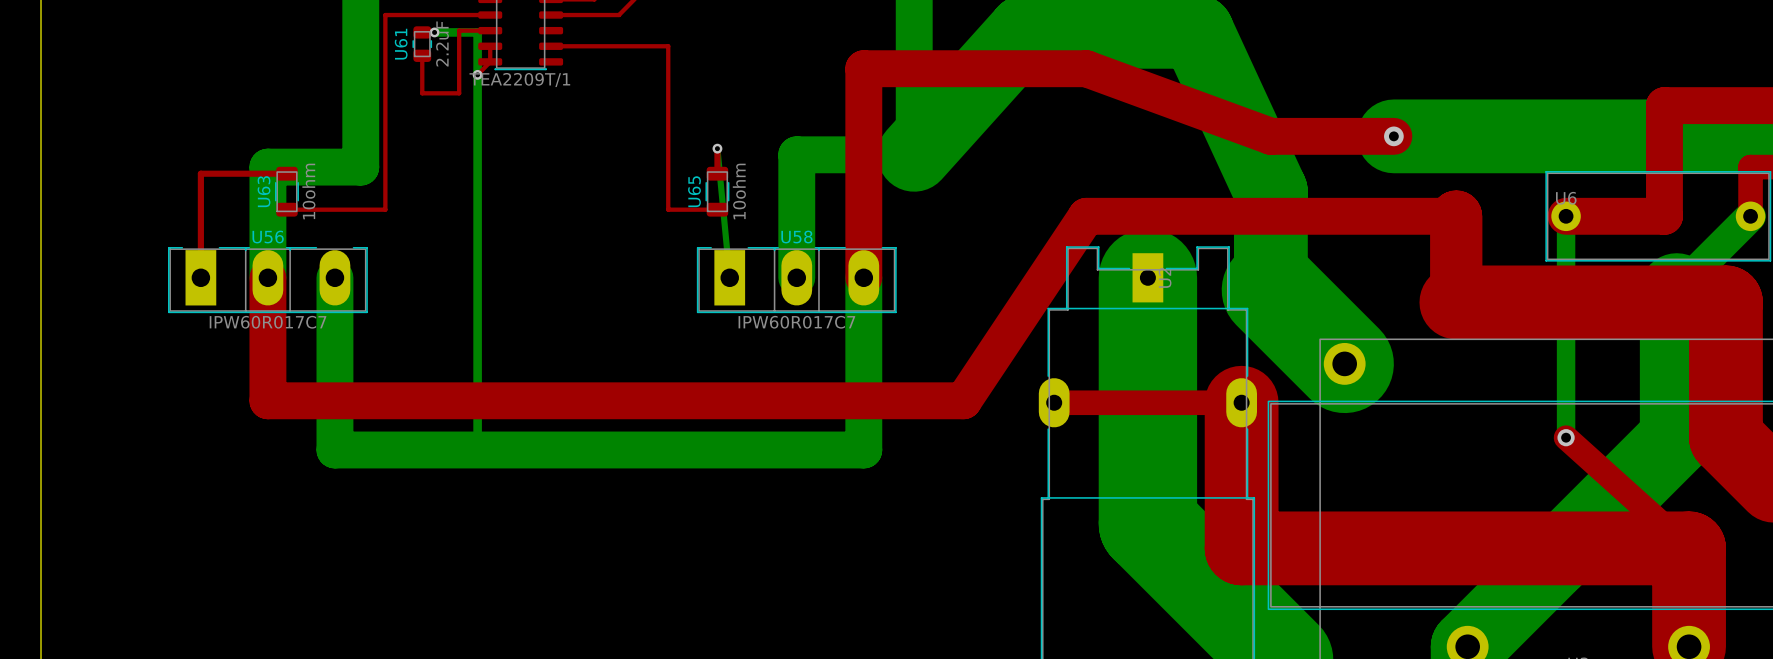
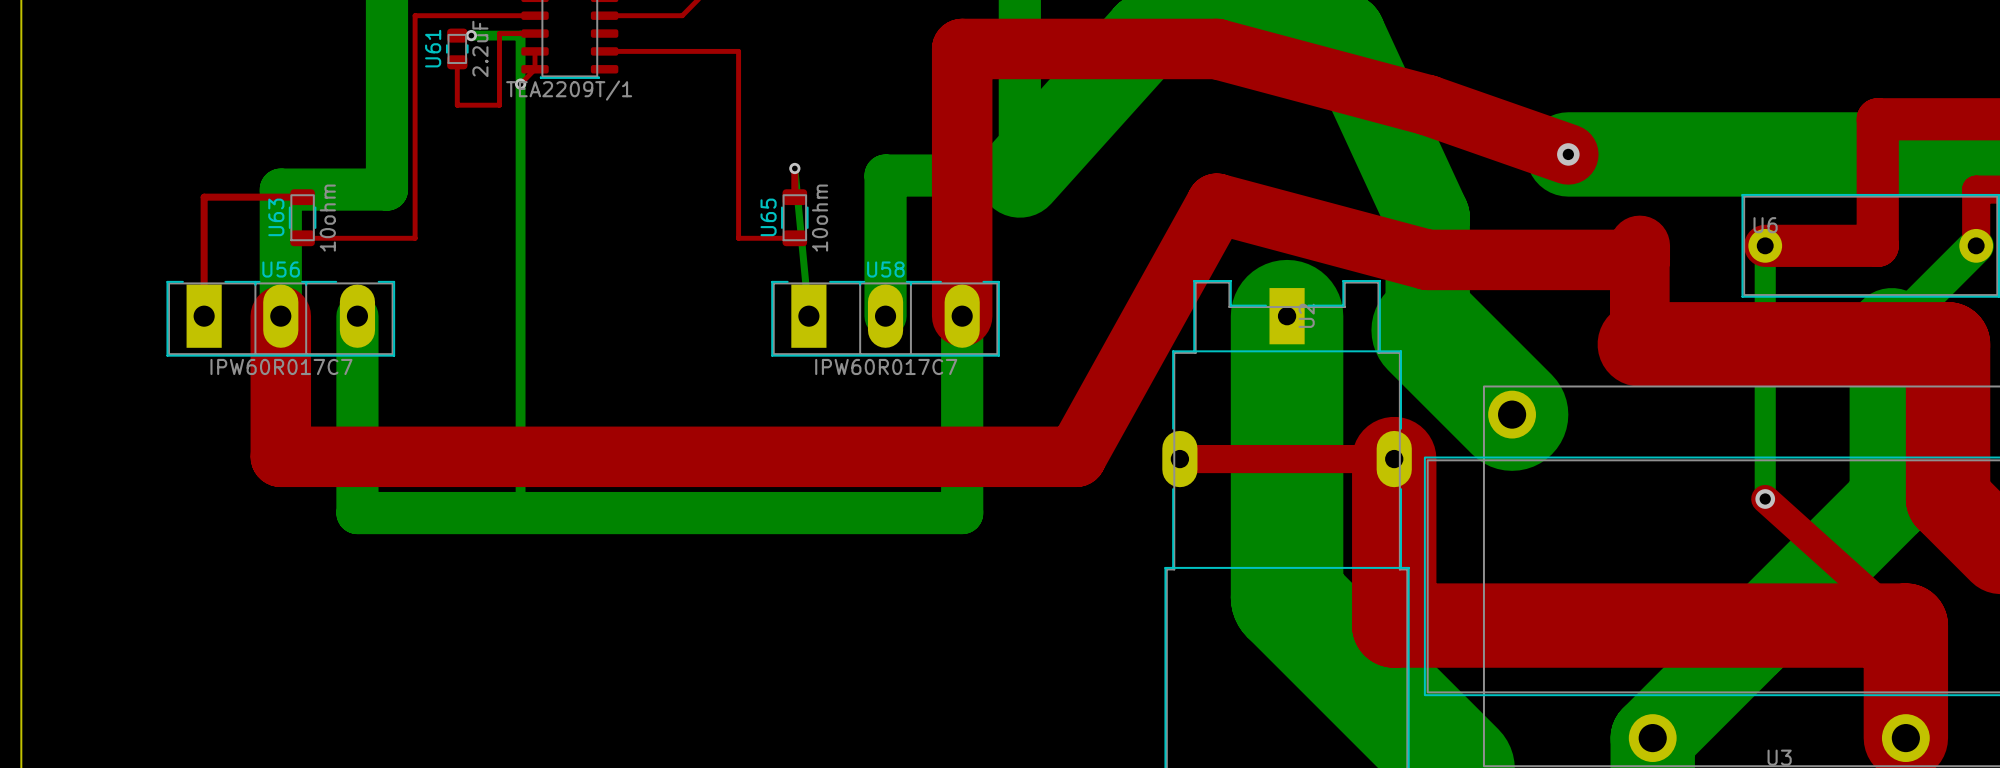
top track: (863, 68) (1086, 68) (1270, 136) (1393, 136) -> (962, 77) (962, 48) (1216, 48) (1427, 105) (1568, 154)
top track width: thin (863, 68) (863, 277) -> thick (962, 77) (962, 316)
top track: (1456, 216) (1086, 216) (963, 400) -> (1639, 245) (1639, 259) (1427, 259) (1216, 203) (1076, 456)
top track width: thin (267, 277) (267, 400) (963, 400) -> thick (280, 316) (280, 456) (1076, 456)

